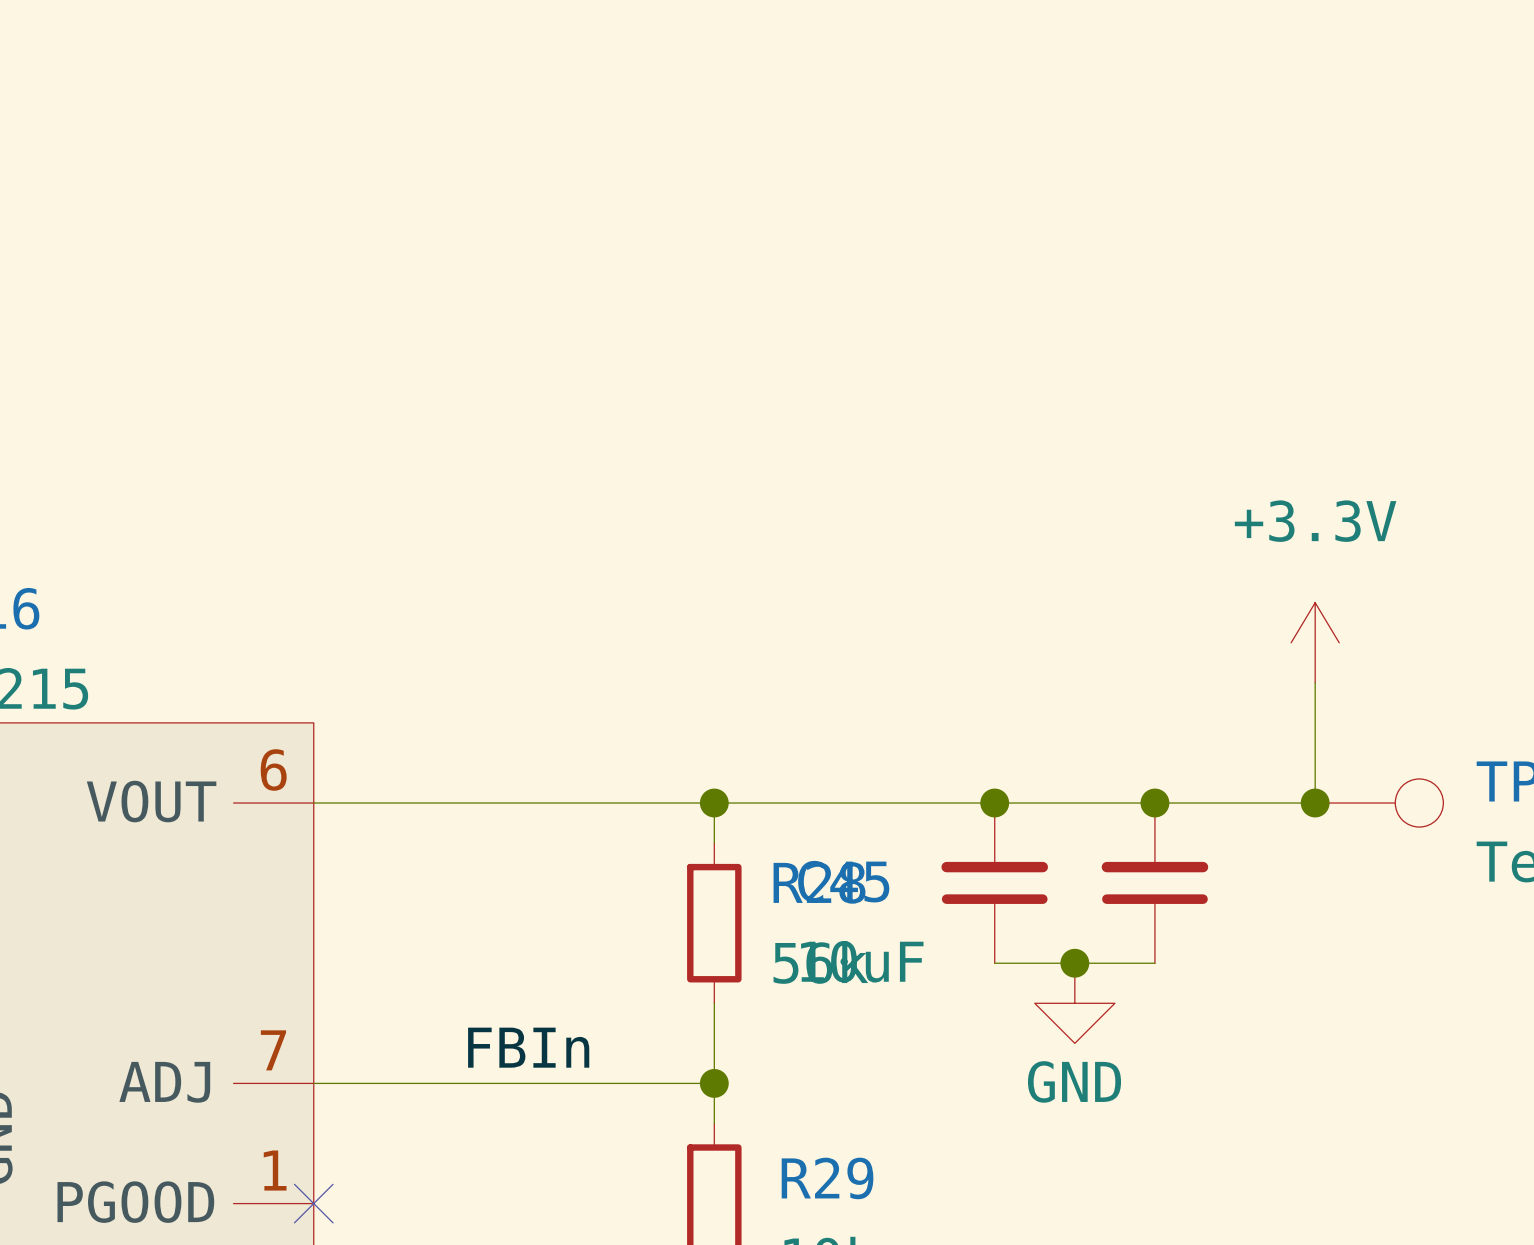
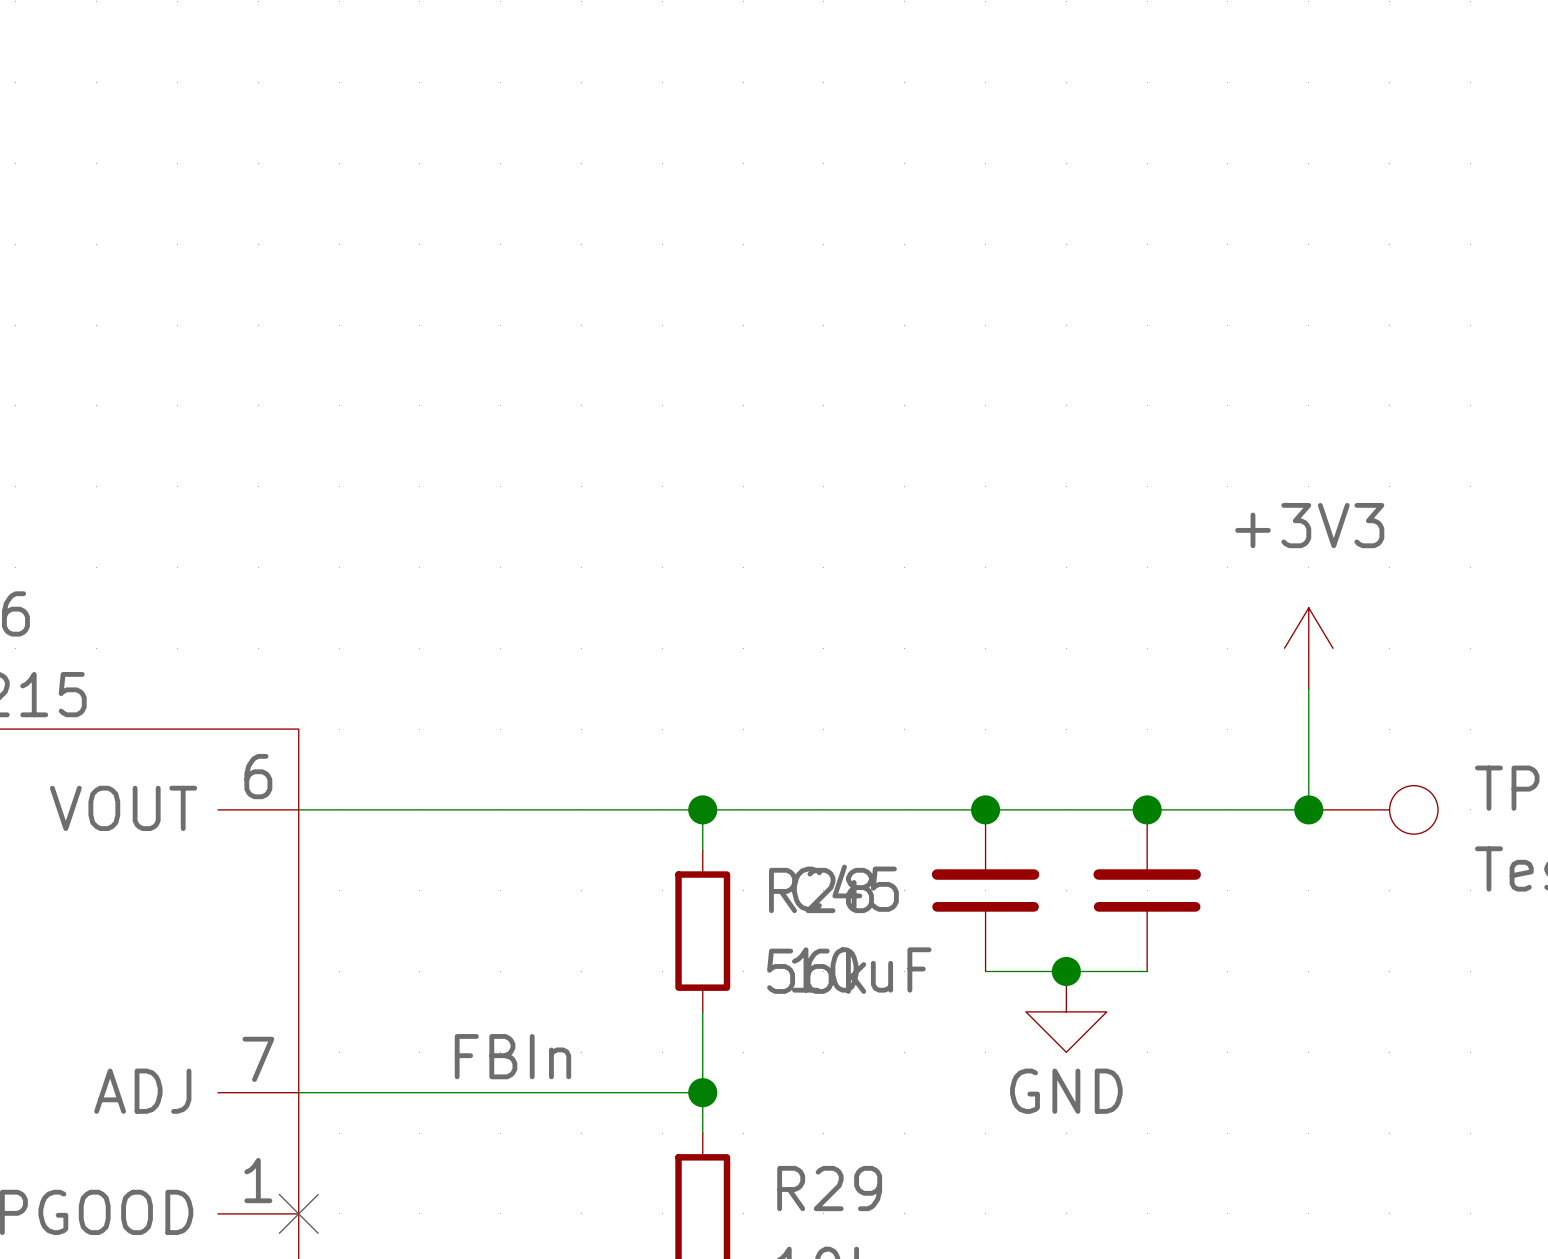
power symbol: +3.3V (1315, 642) -> +3V3 (1308, 648)

